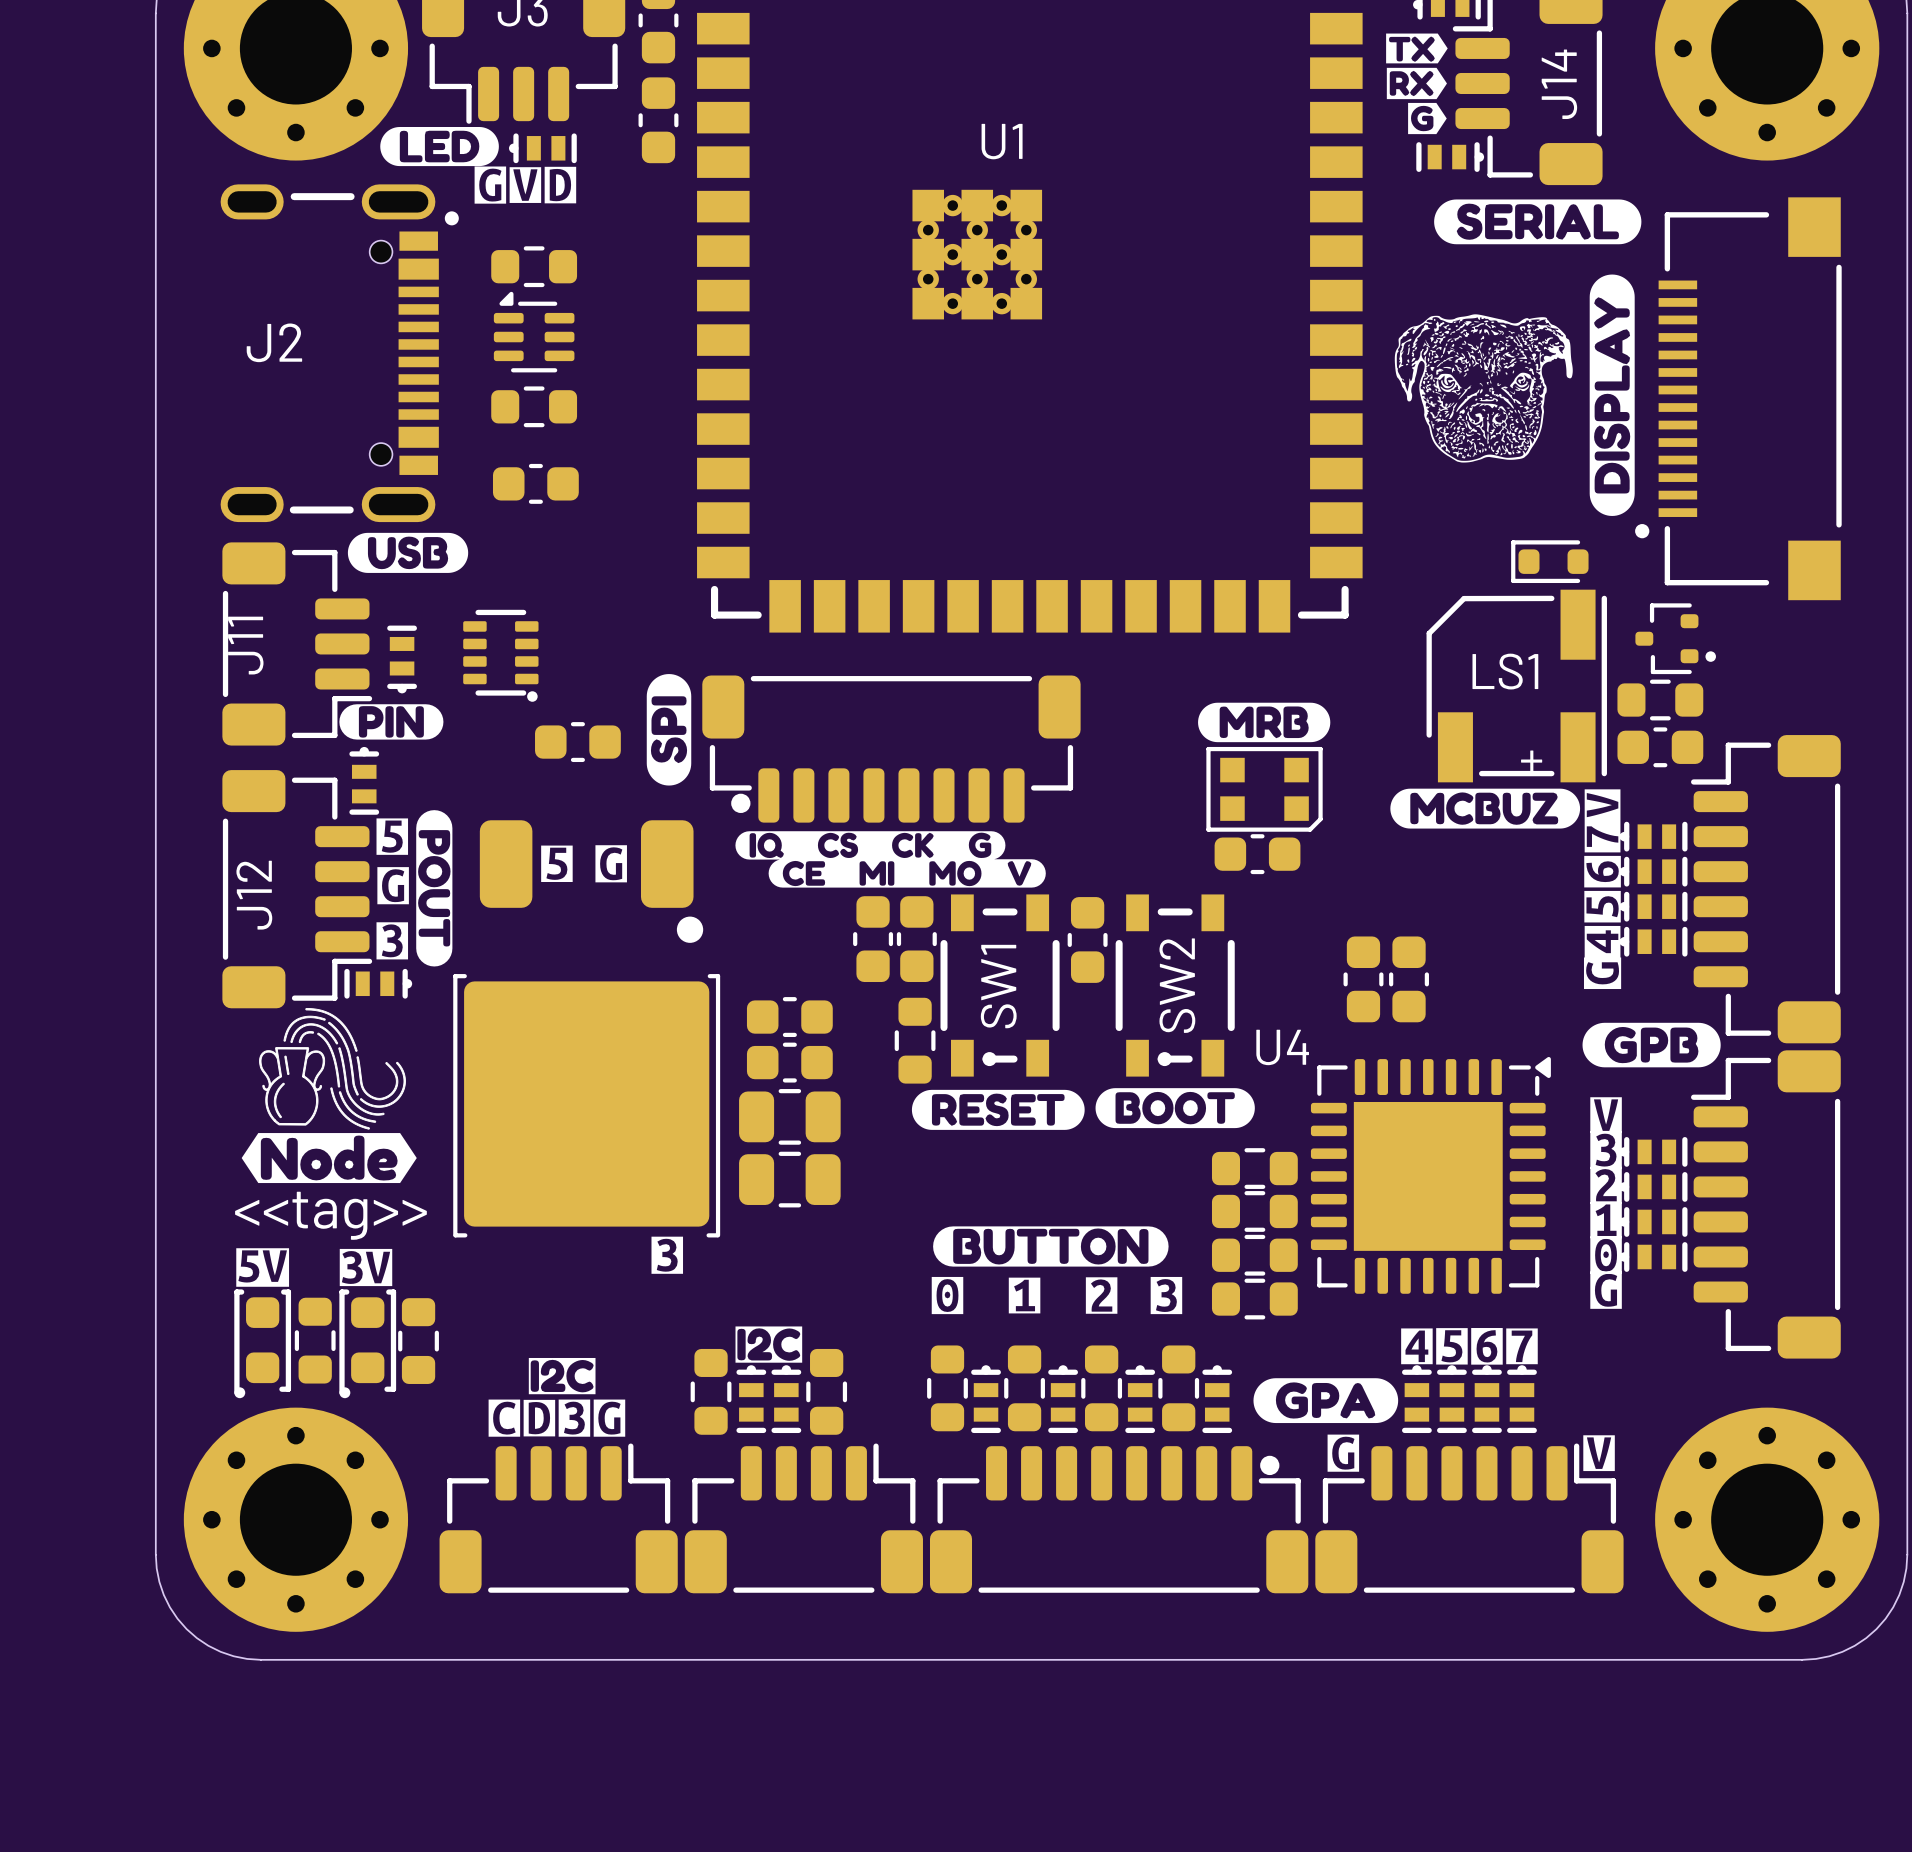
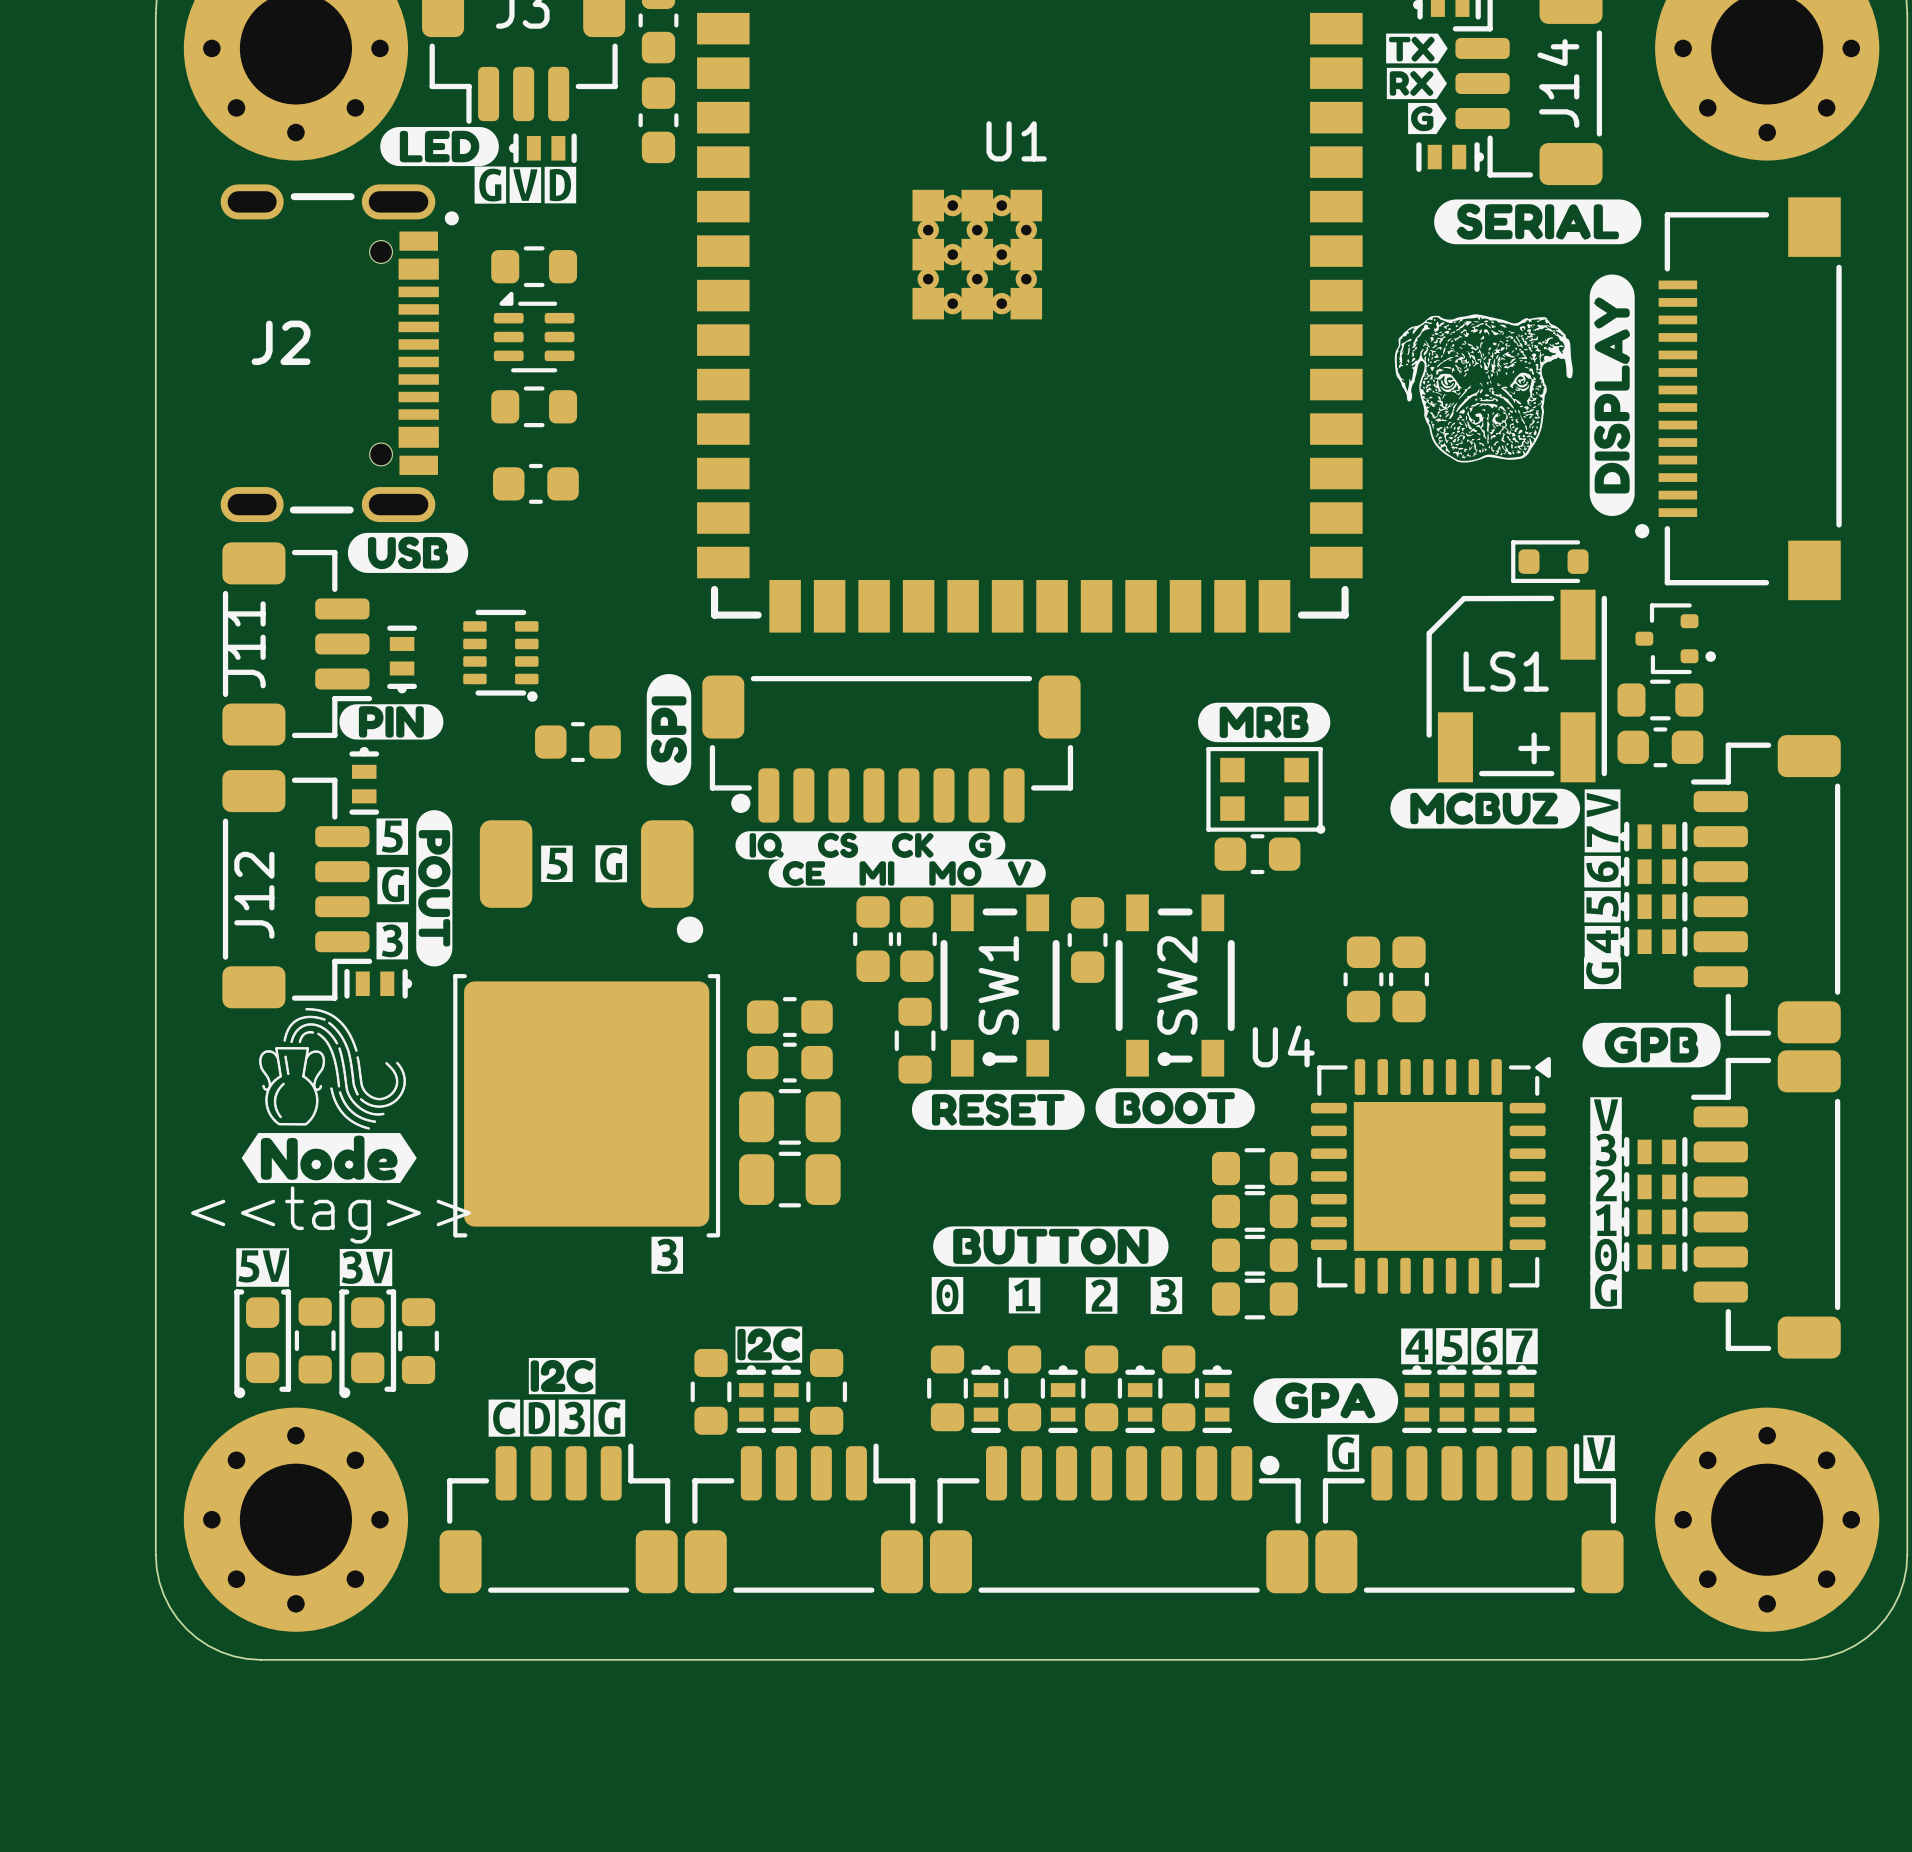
part footprint: [1206, 746, 1323, 832] -> [1206, 746, 1326, 834]

